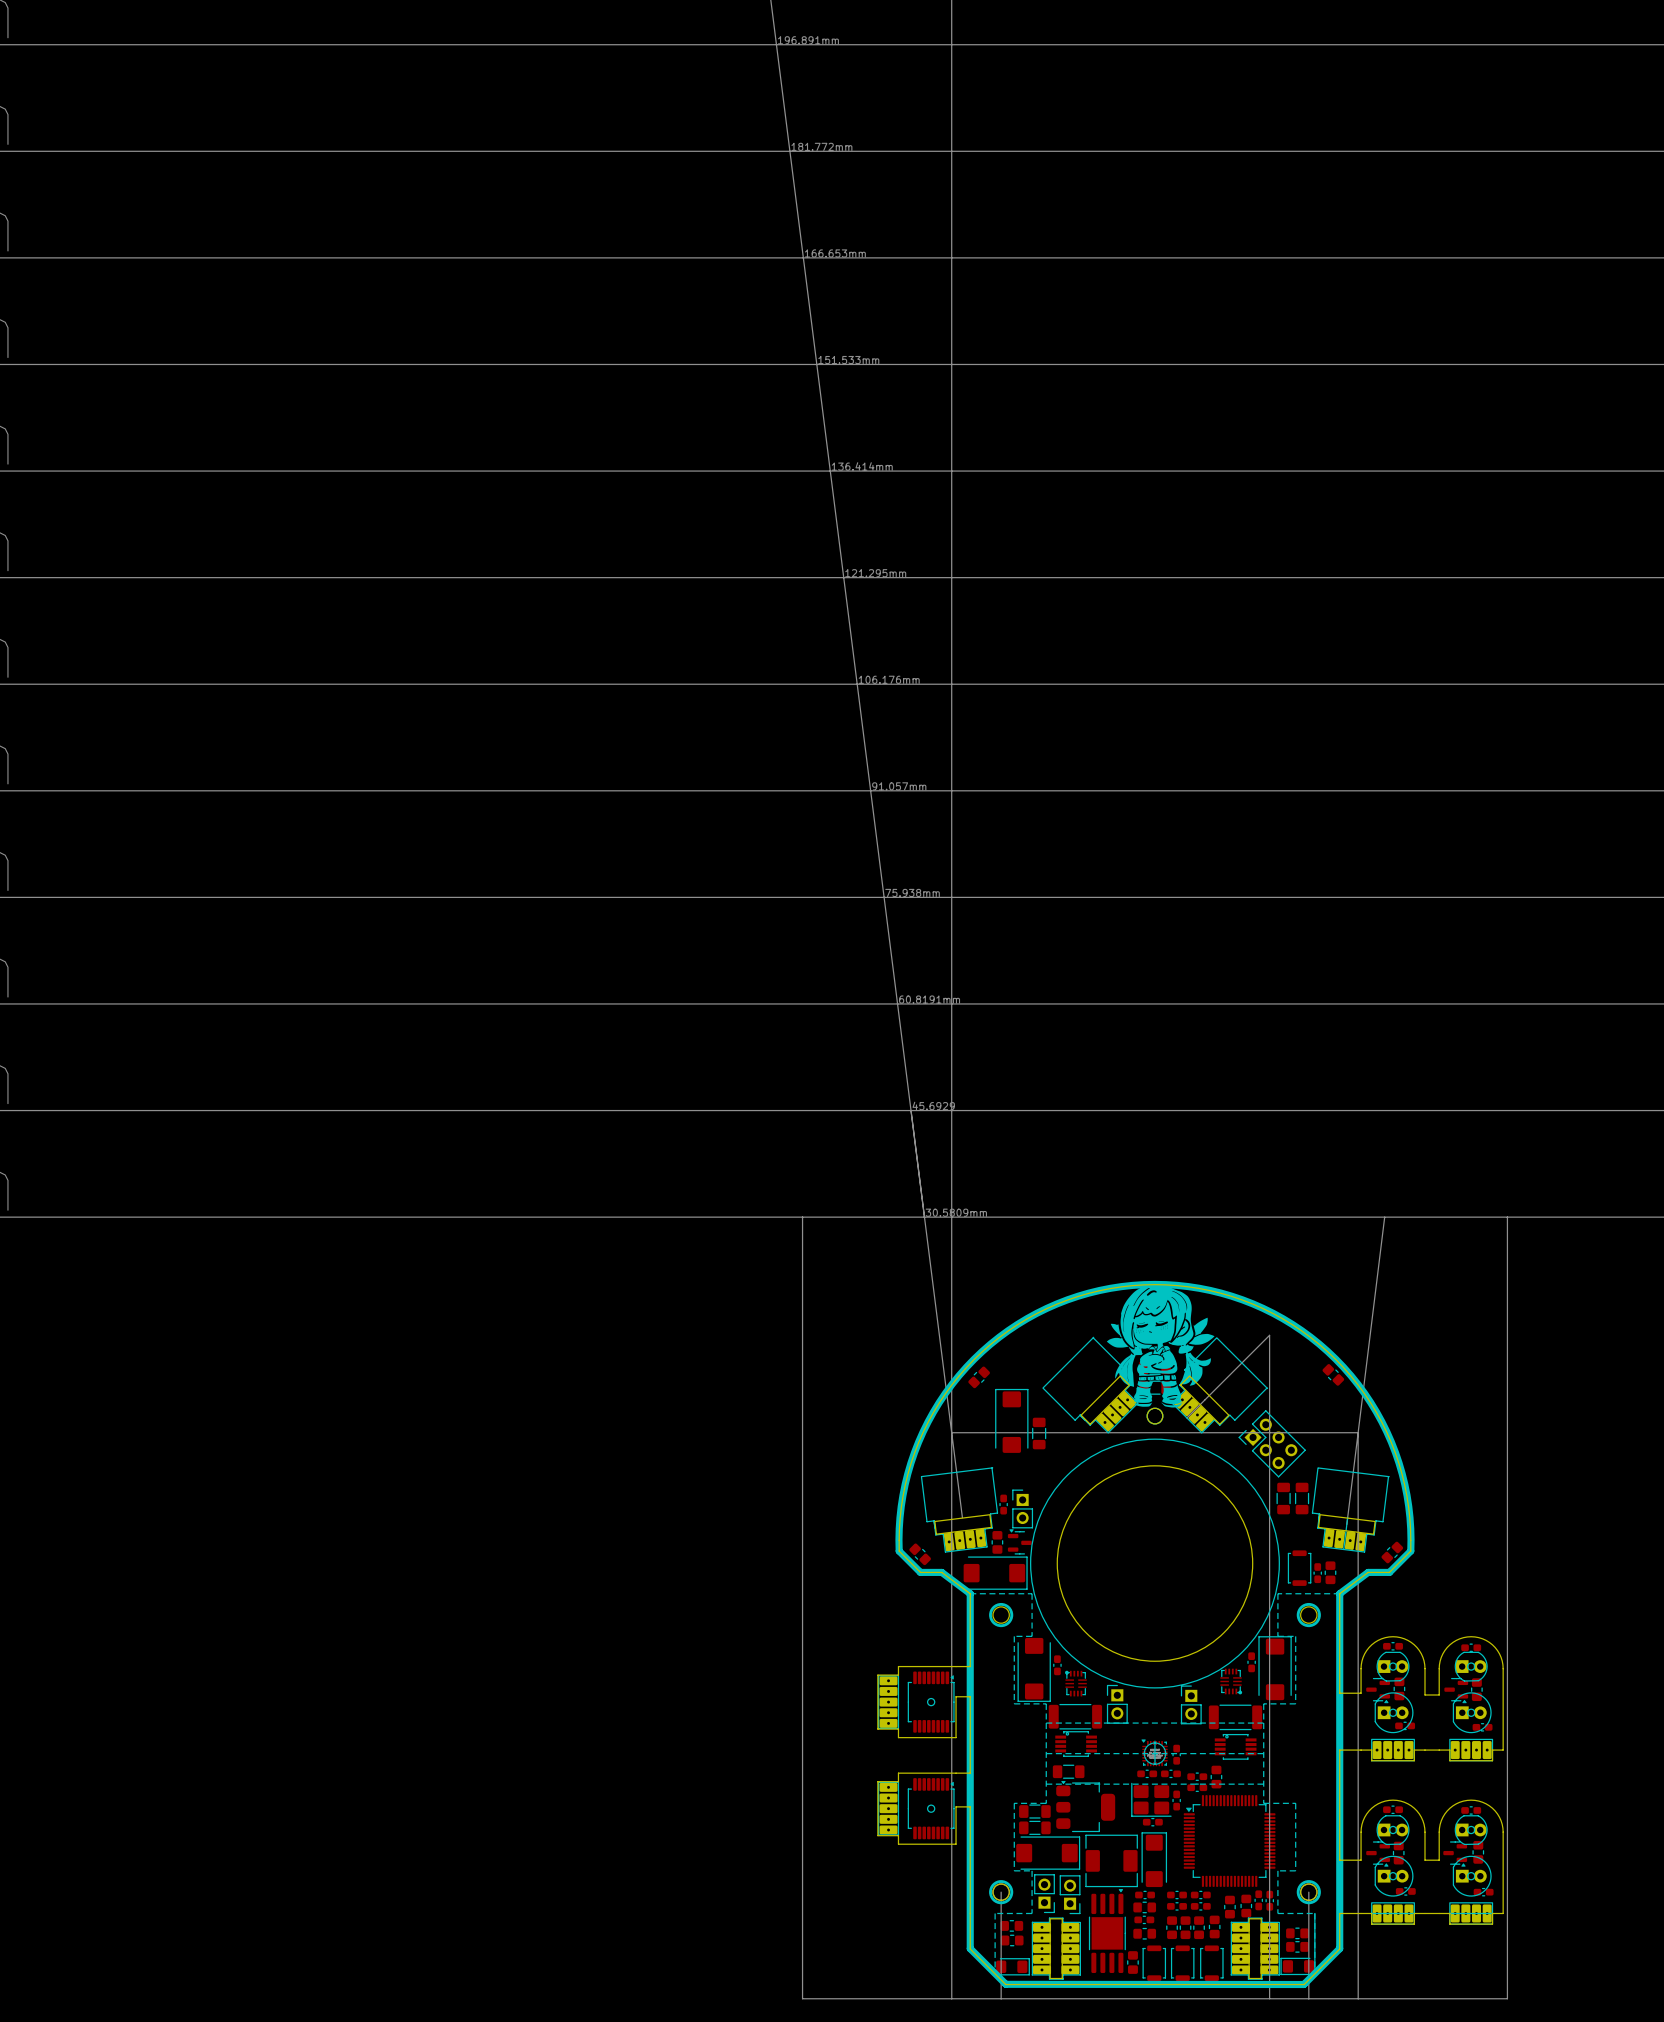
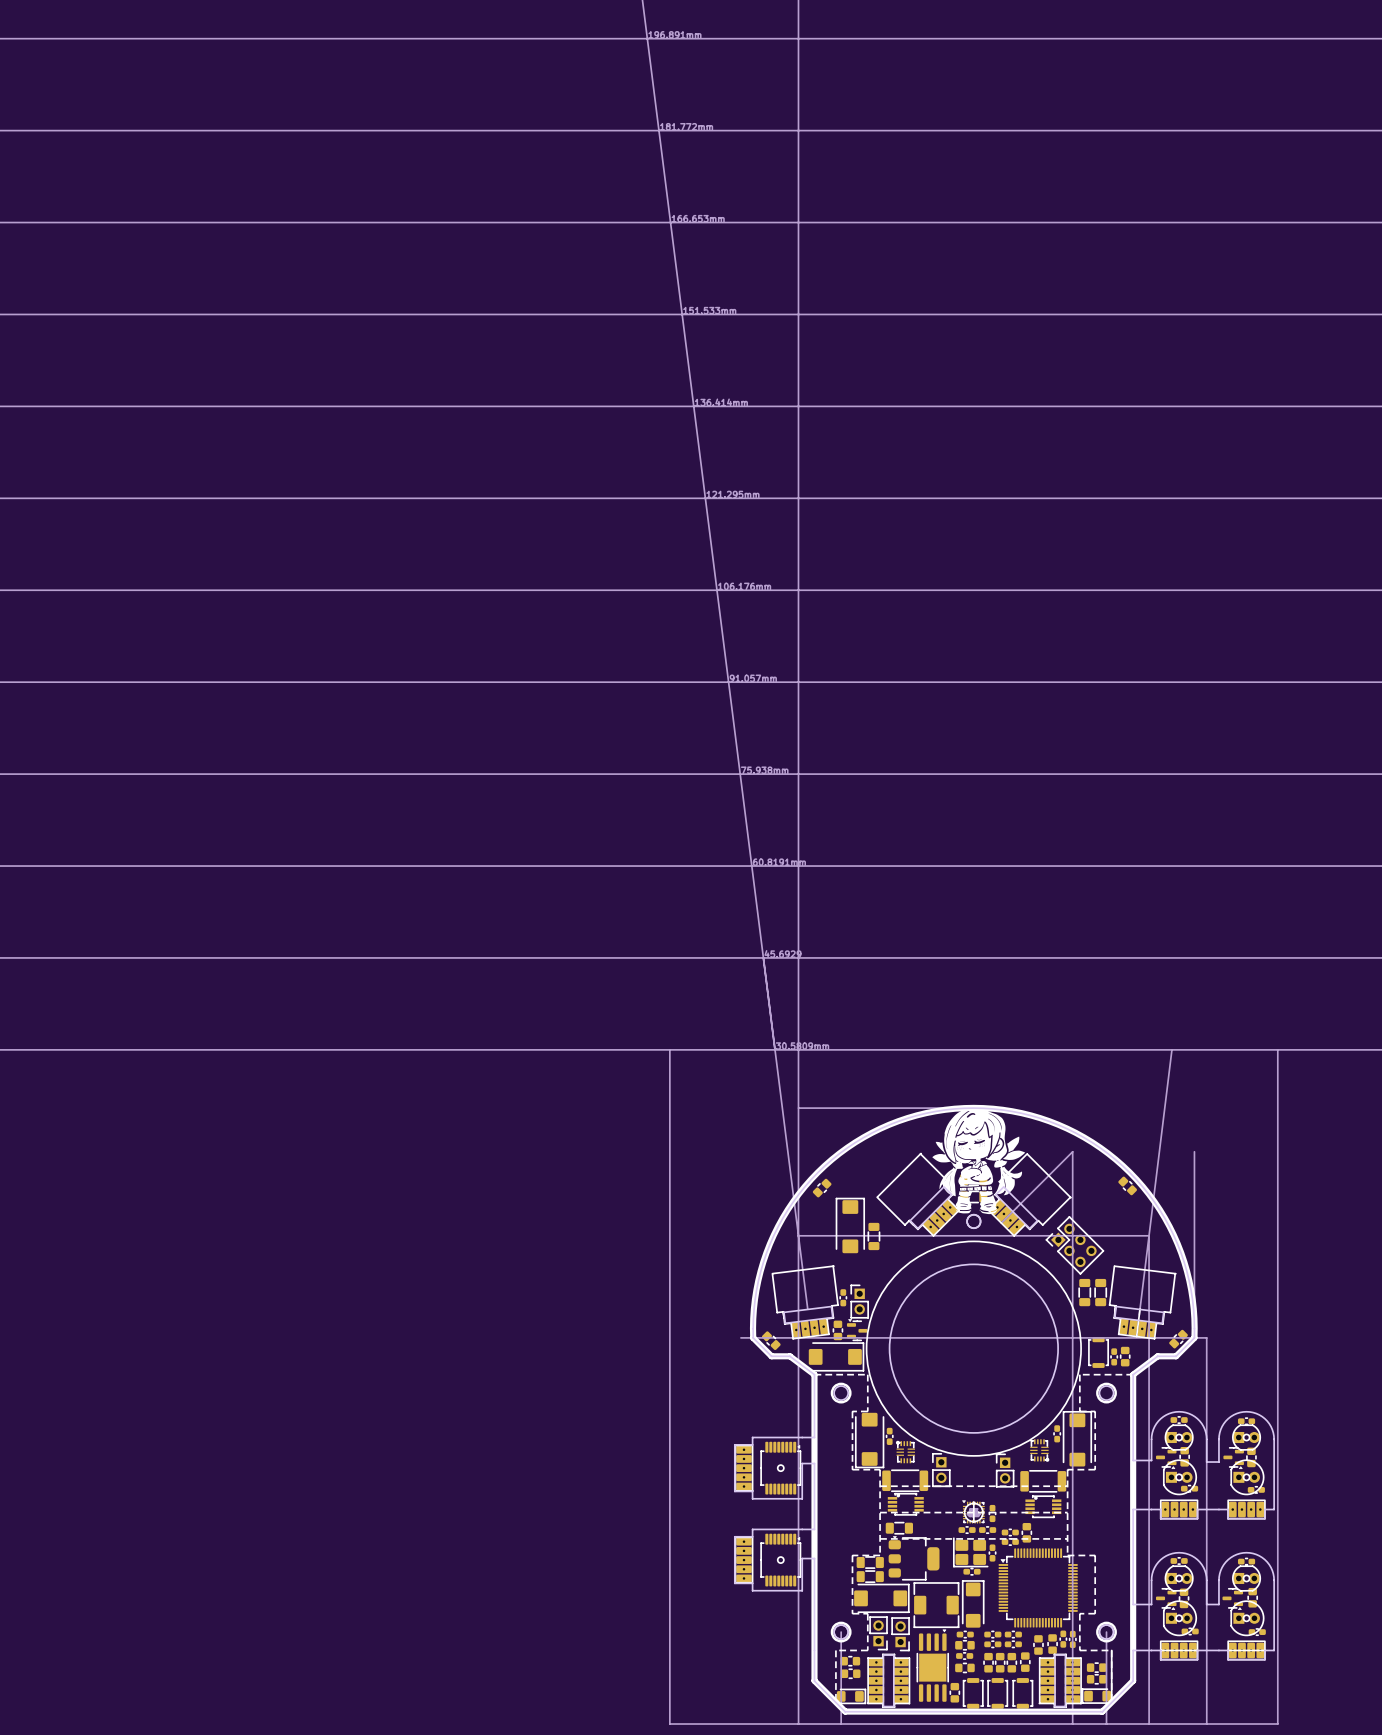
line: none -> (798, 1108) (973, 1108)
line: none -> (1194, 1151) (1194, 1337)
line: none -> (740, 1337) (1206, 1337) (1206, 1724)

